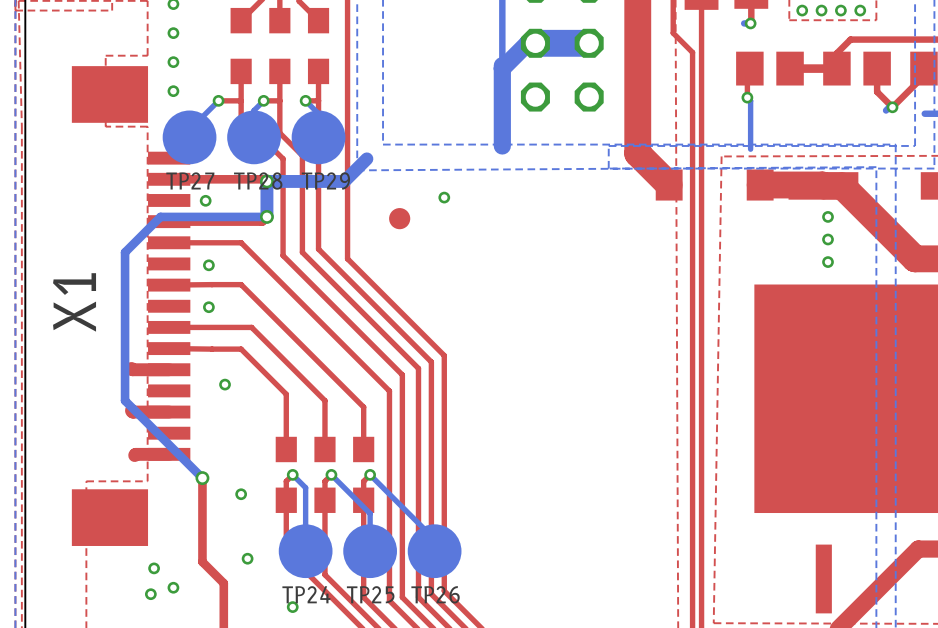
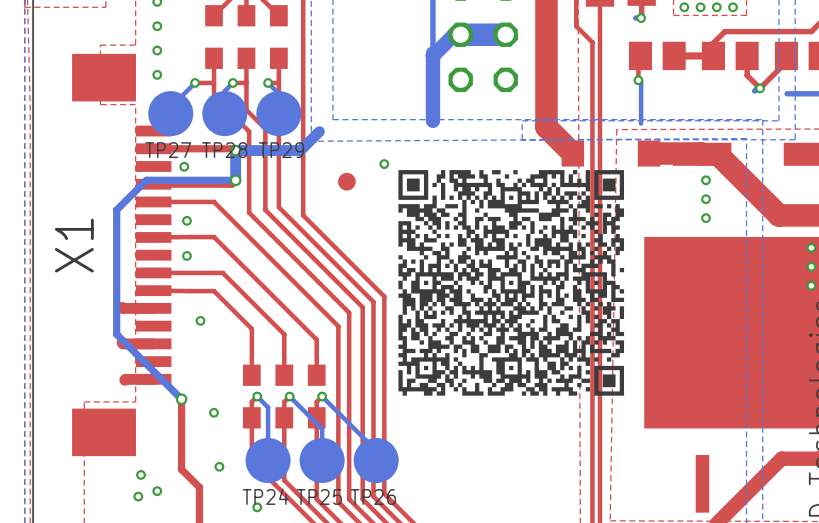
drawing: none -> [398, 170, 625, 396]

